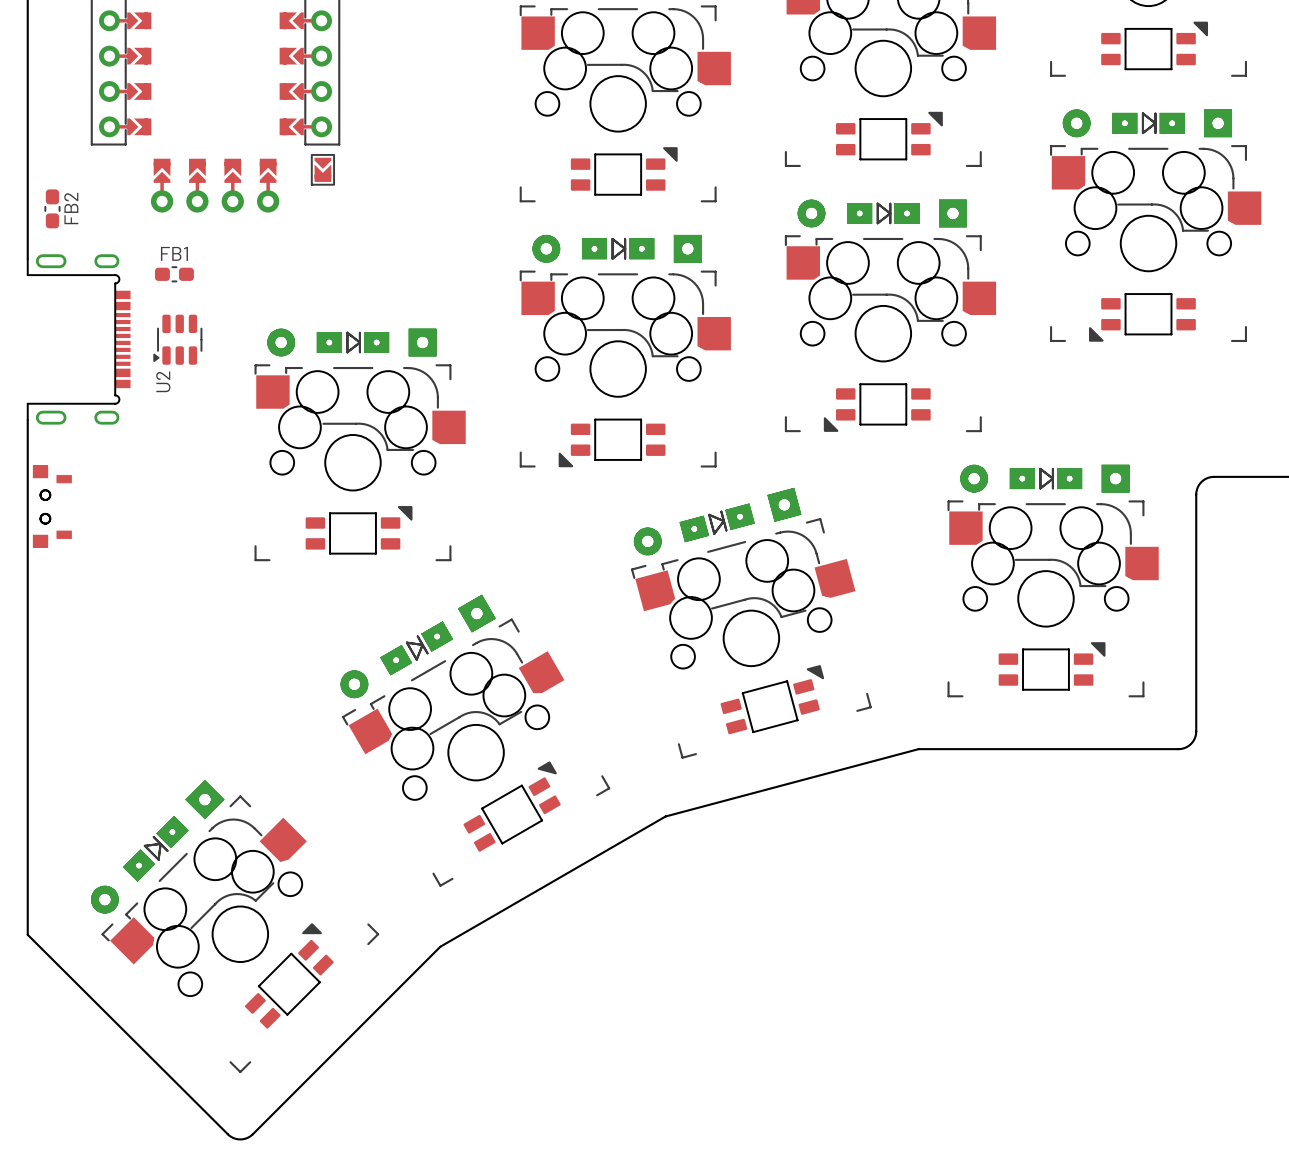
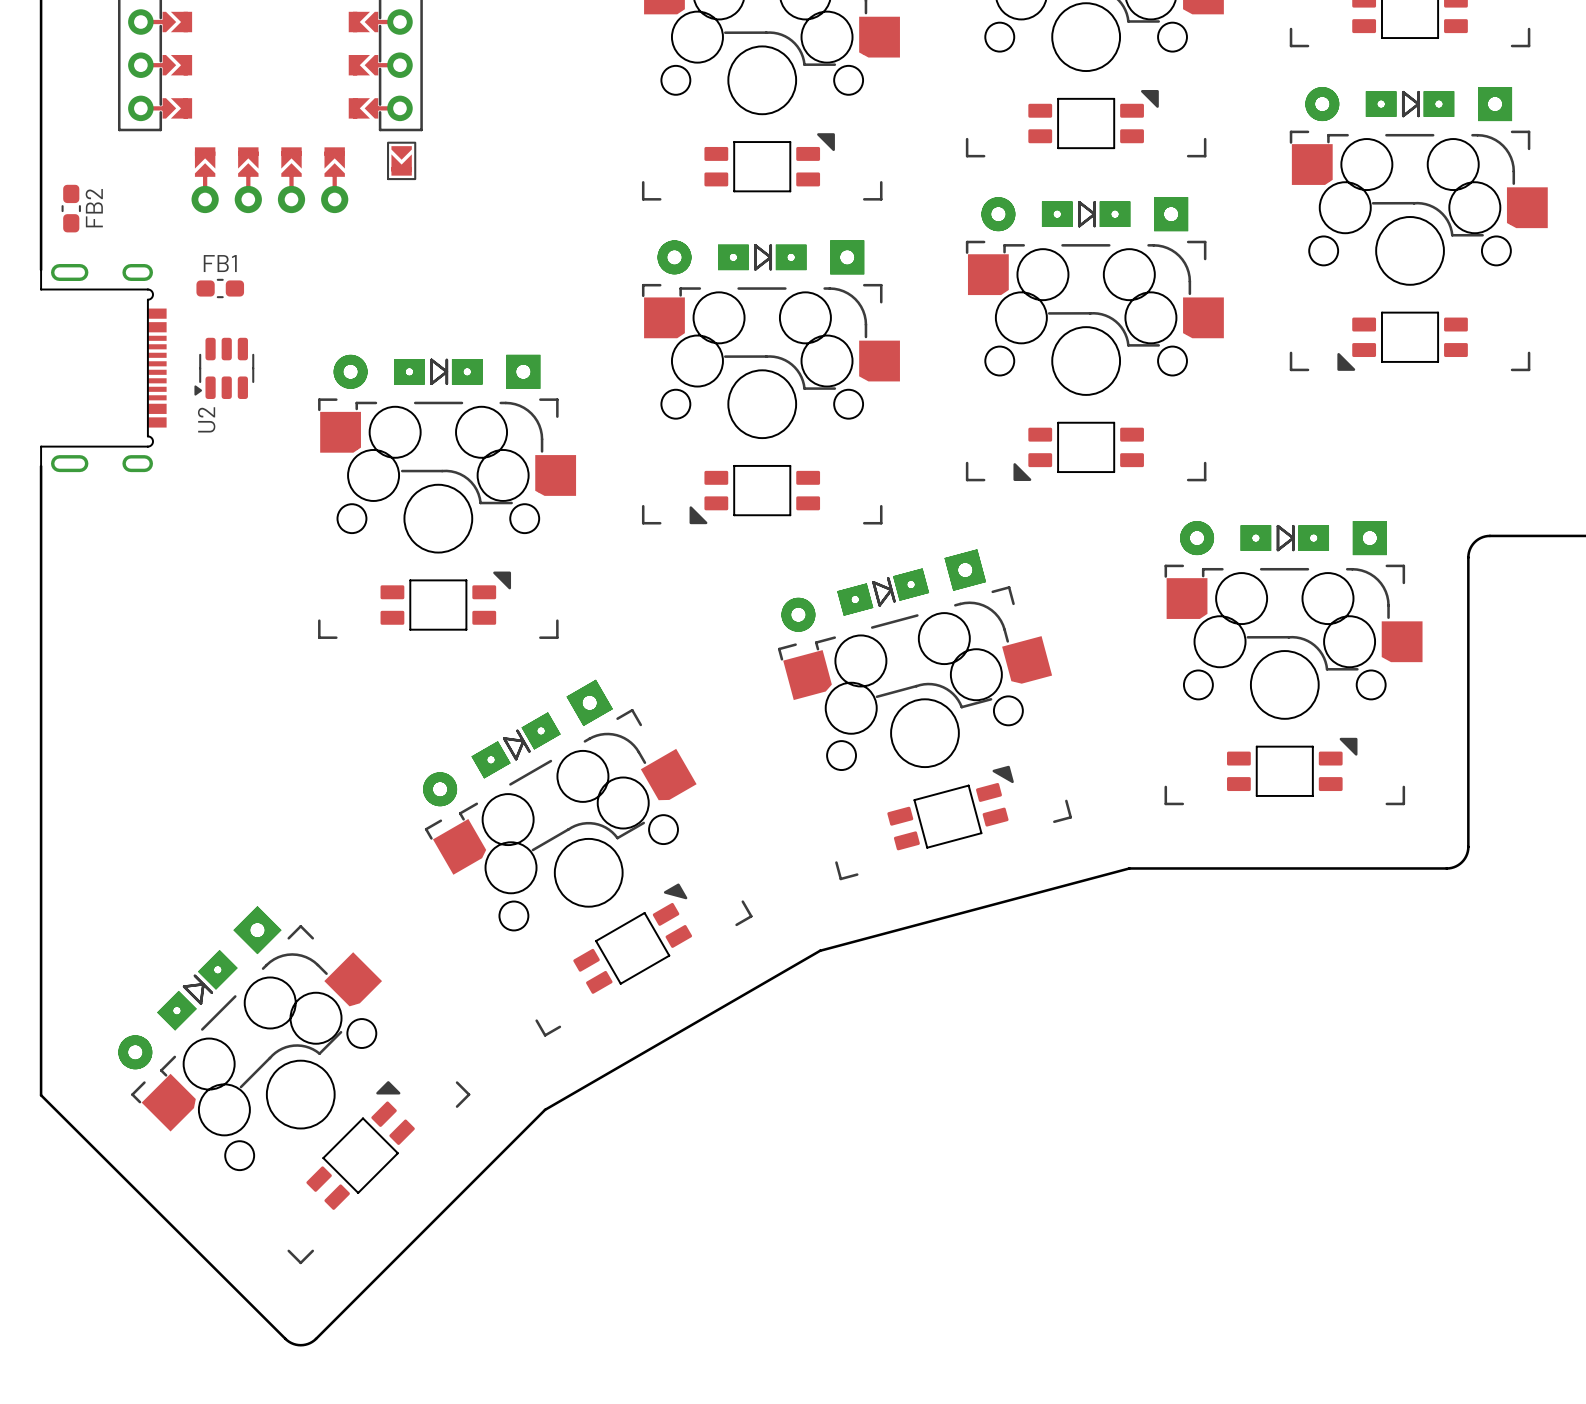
part: (45, 506) -> none
part: (52, 506) -> none

